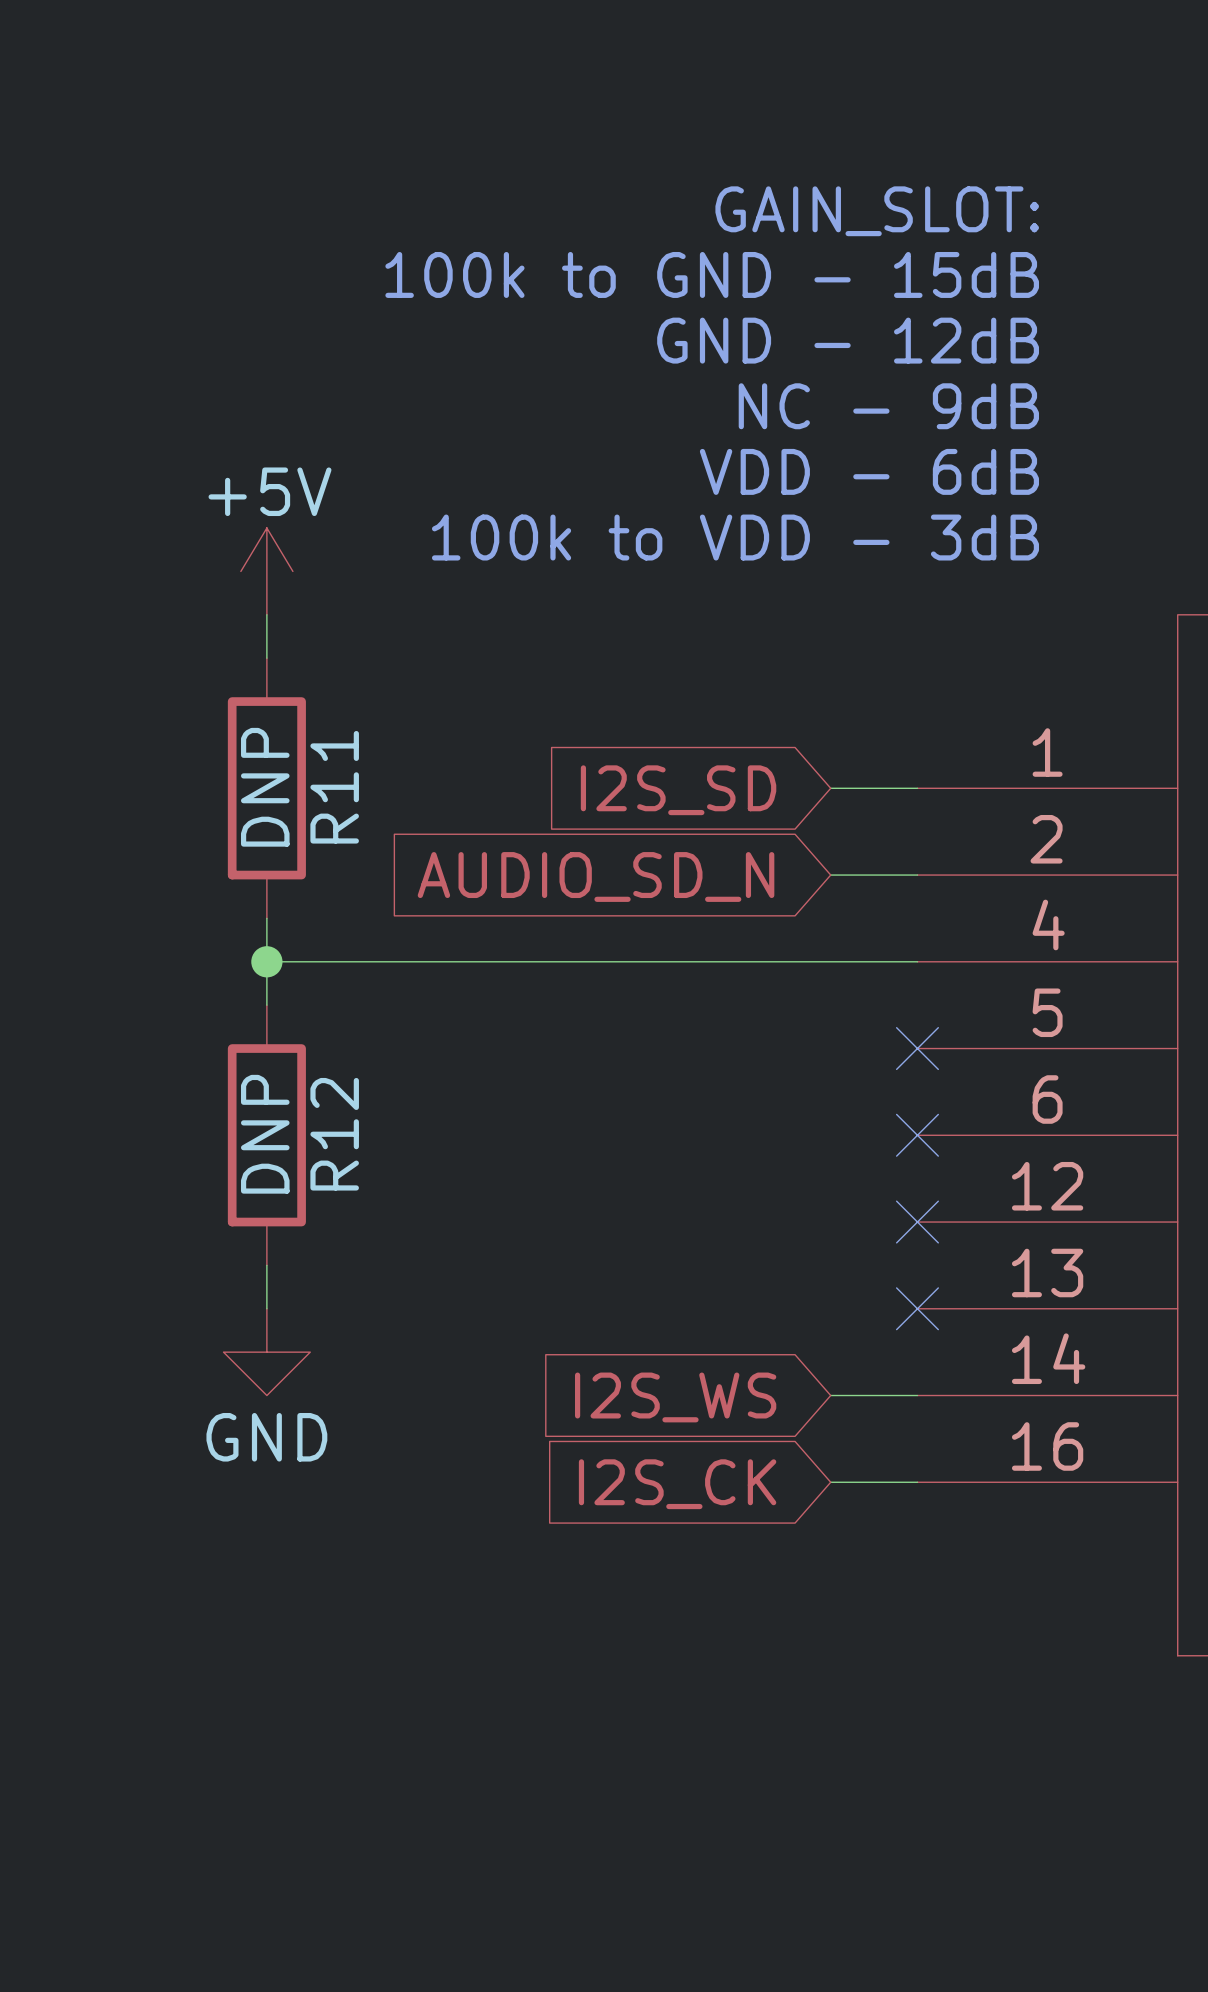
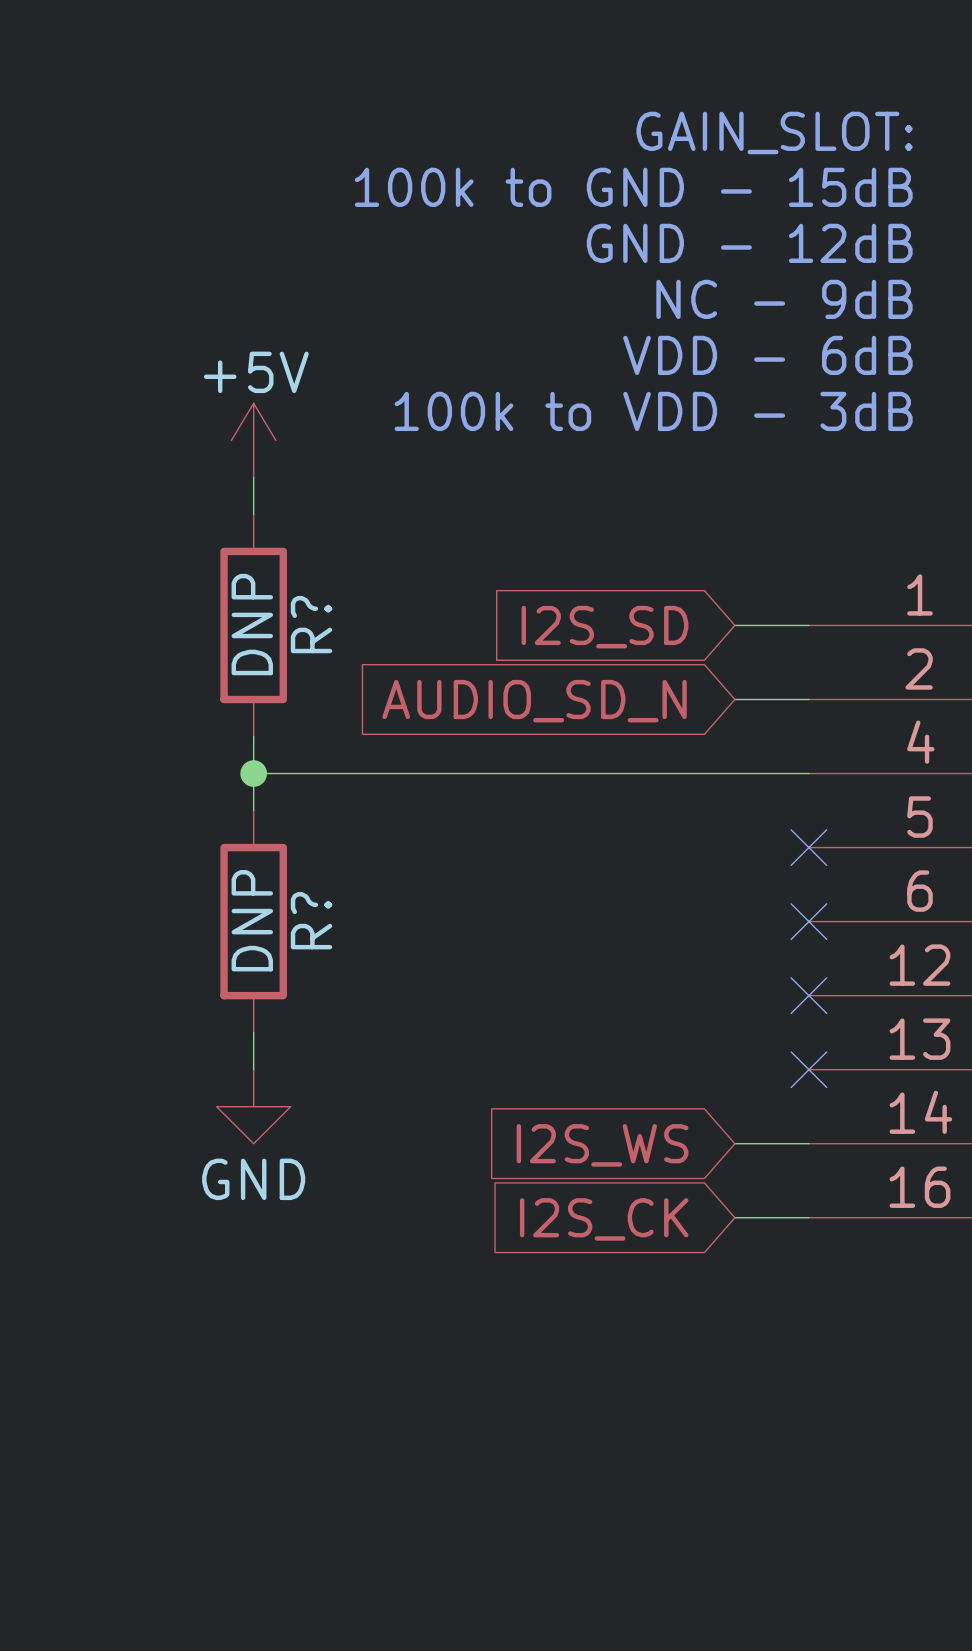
R11 name: R11 (334, 787) -> R? (311, 624)
R12 name: R12 (334, 1134) -> R? (311, 920)

